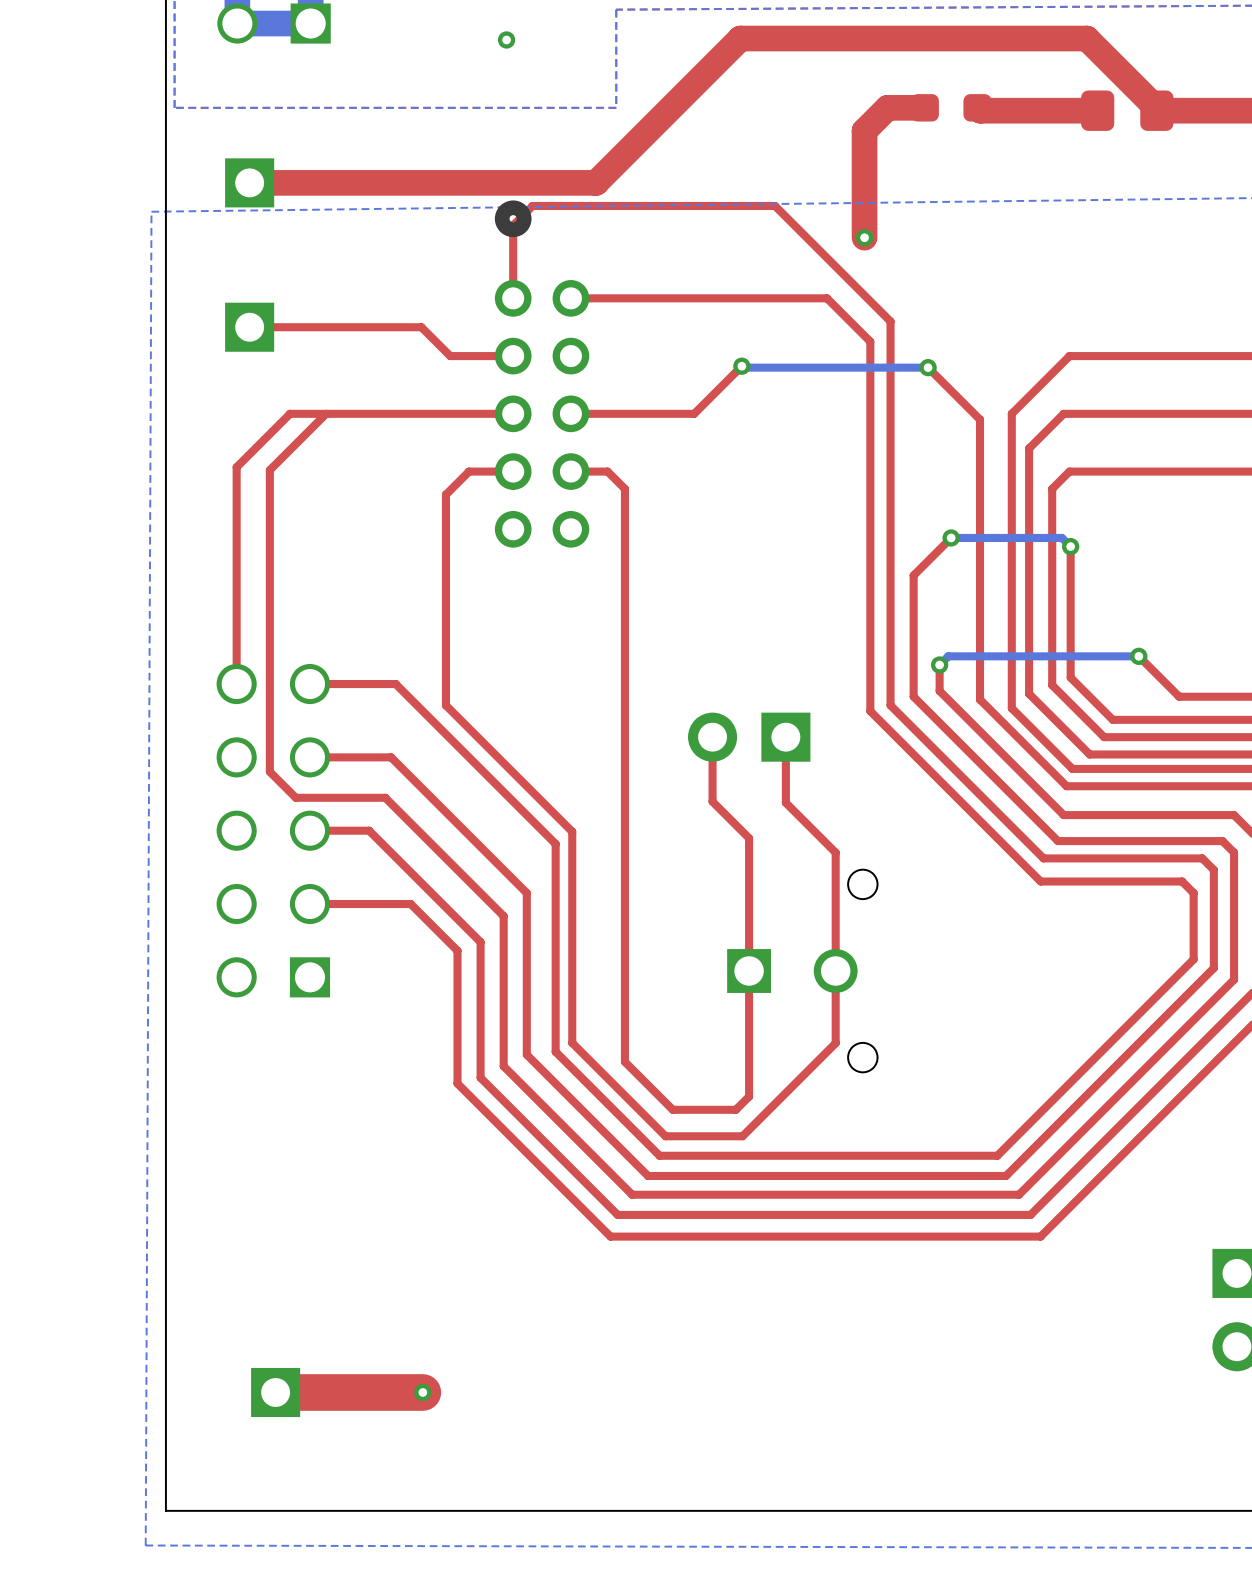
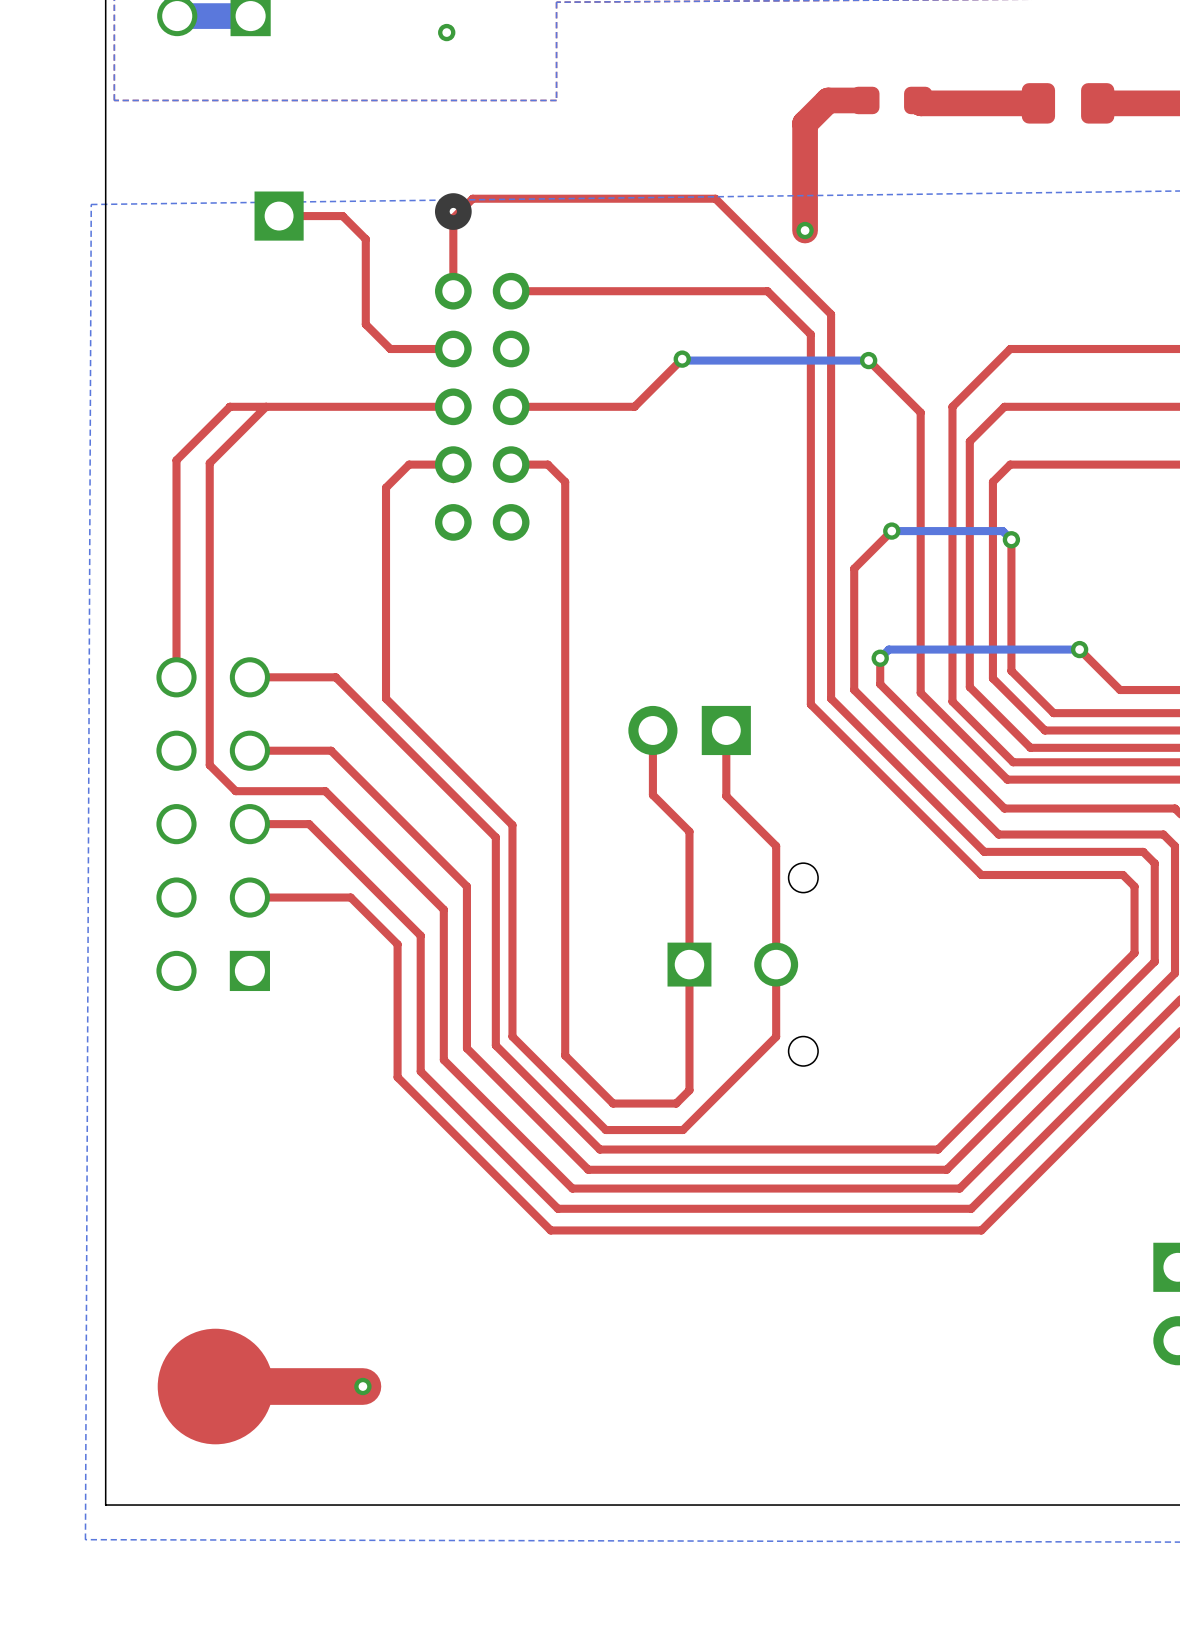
top track: (1156, 110) (1156, 108) (1086, 38) (740, 38) (596, 182) (249, 182) -> none
part: (249, 182) -> none
part: none -> (279, 216)
top track: (249, 327) (421, 327) (425, 331) -> (279, 216) (342, 216) (365, 239) (365, 324)
part: (249, 327) -> none
part footprint: [251, 1367, 301, 1418] -> [157, 1328, 274, 1445]

